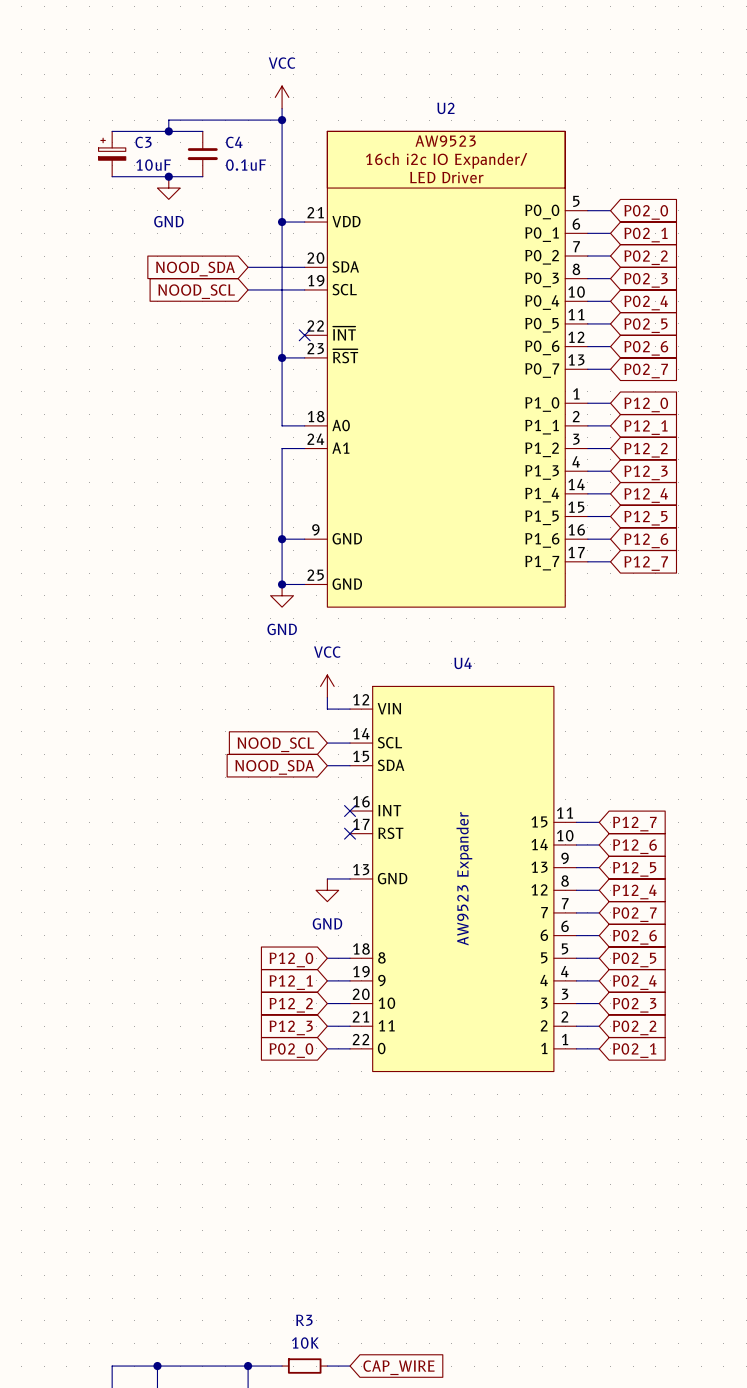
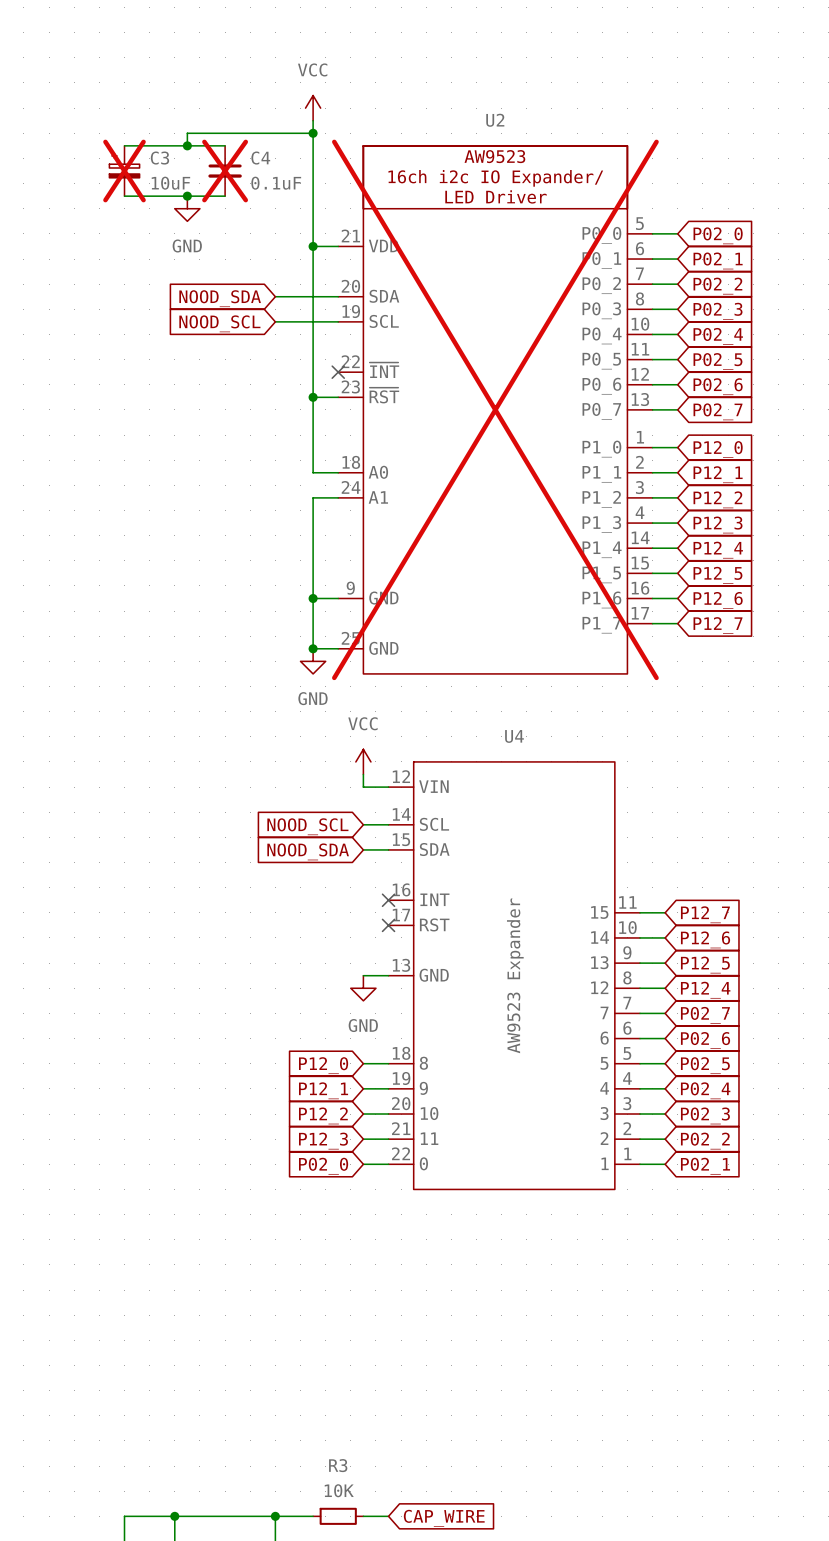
C3 do-not-place cross: none -> (124, 171)
C4 do-not-place cross: none -> (225, 171)
U2 do-not-place cross: none -> (495, 409)

